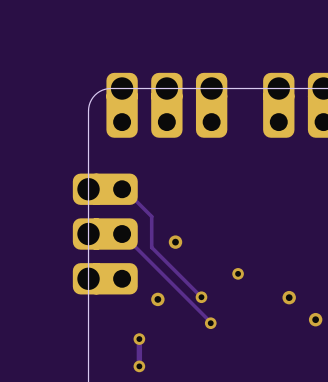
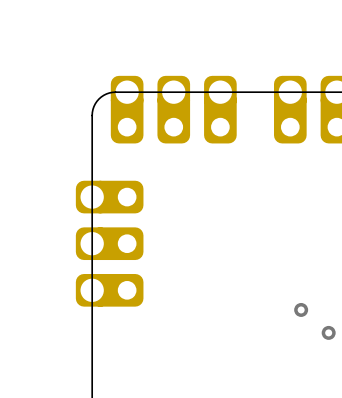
track: (94, 189) (124, 189) (151, 216) (151, 247) (201, 297) -> none
track: (94, 234) (122, 234) (210, 323) -> none
via: (175, 242) -> none
via: (238, 273) -> none
via: (201, 297) -> none
via: (157, 299) -> none
via: (210, 323) -> none
track: (139, 339) (139, 366) -> none
via: (139, 339) -> none
via: (139, 366) -> none

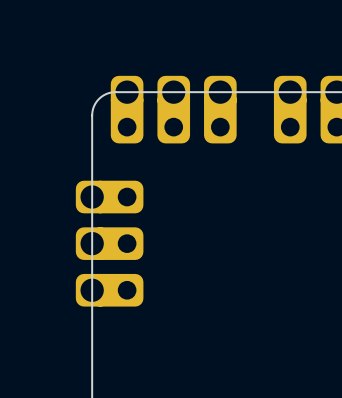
via: (301, 309) -> none
via: (328, 332) -> none

